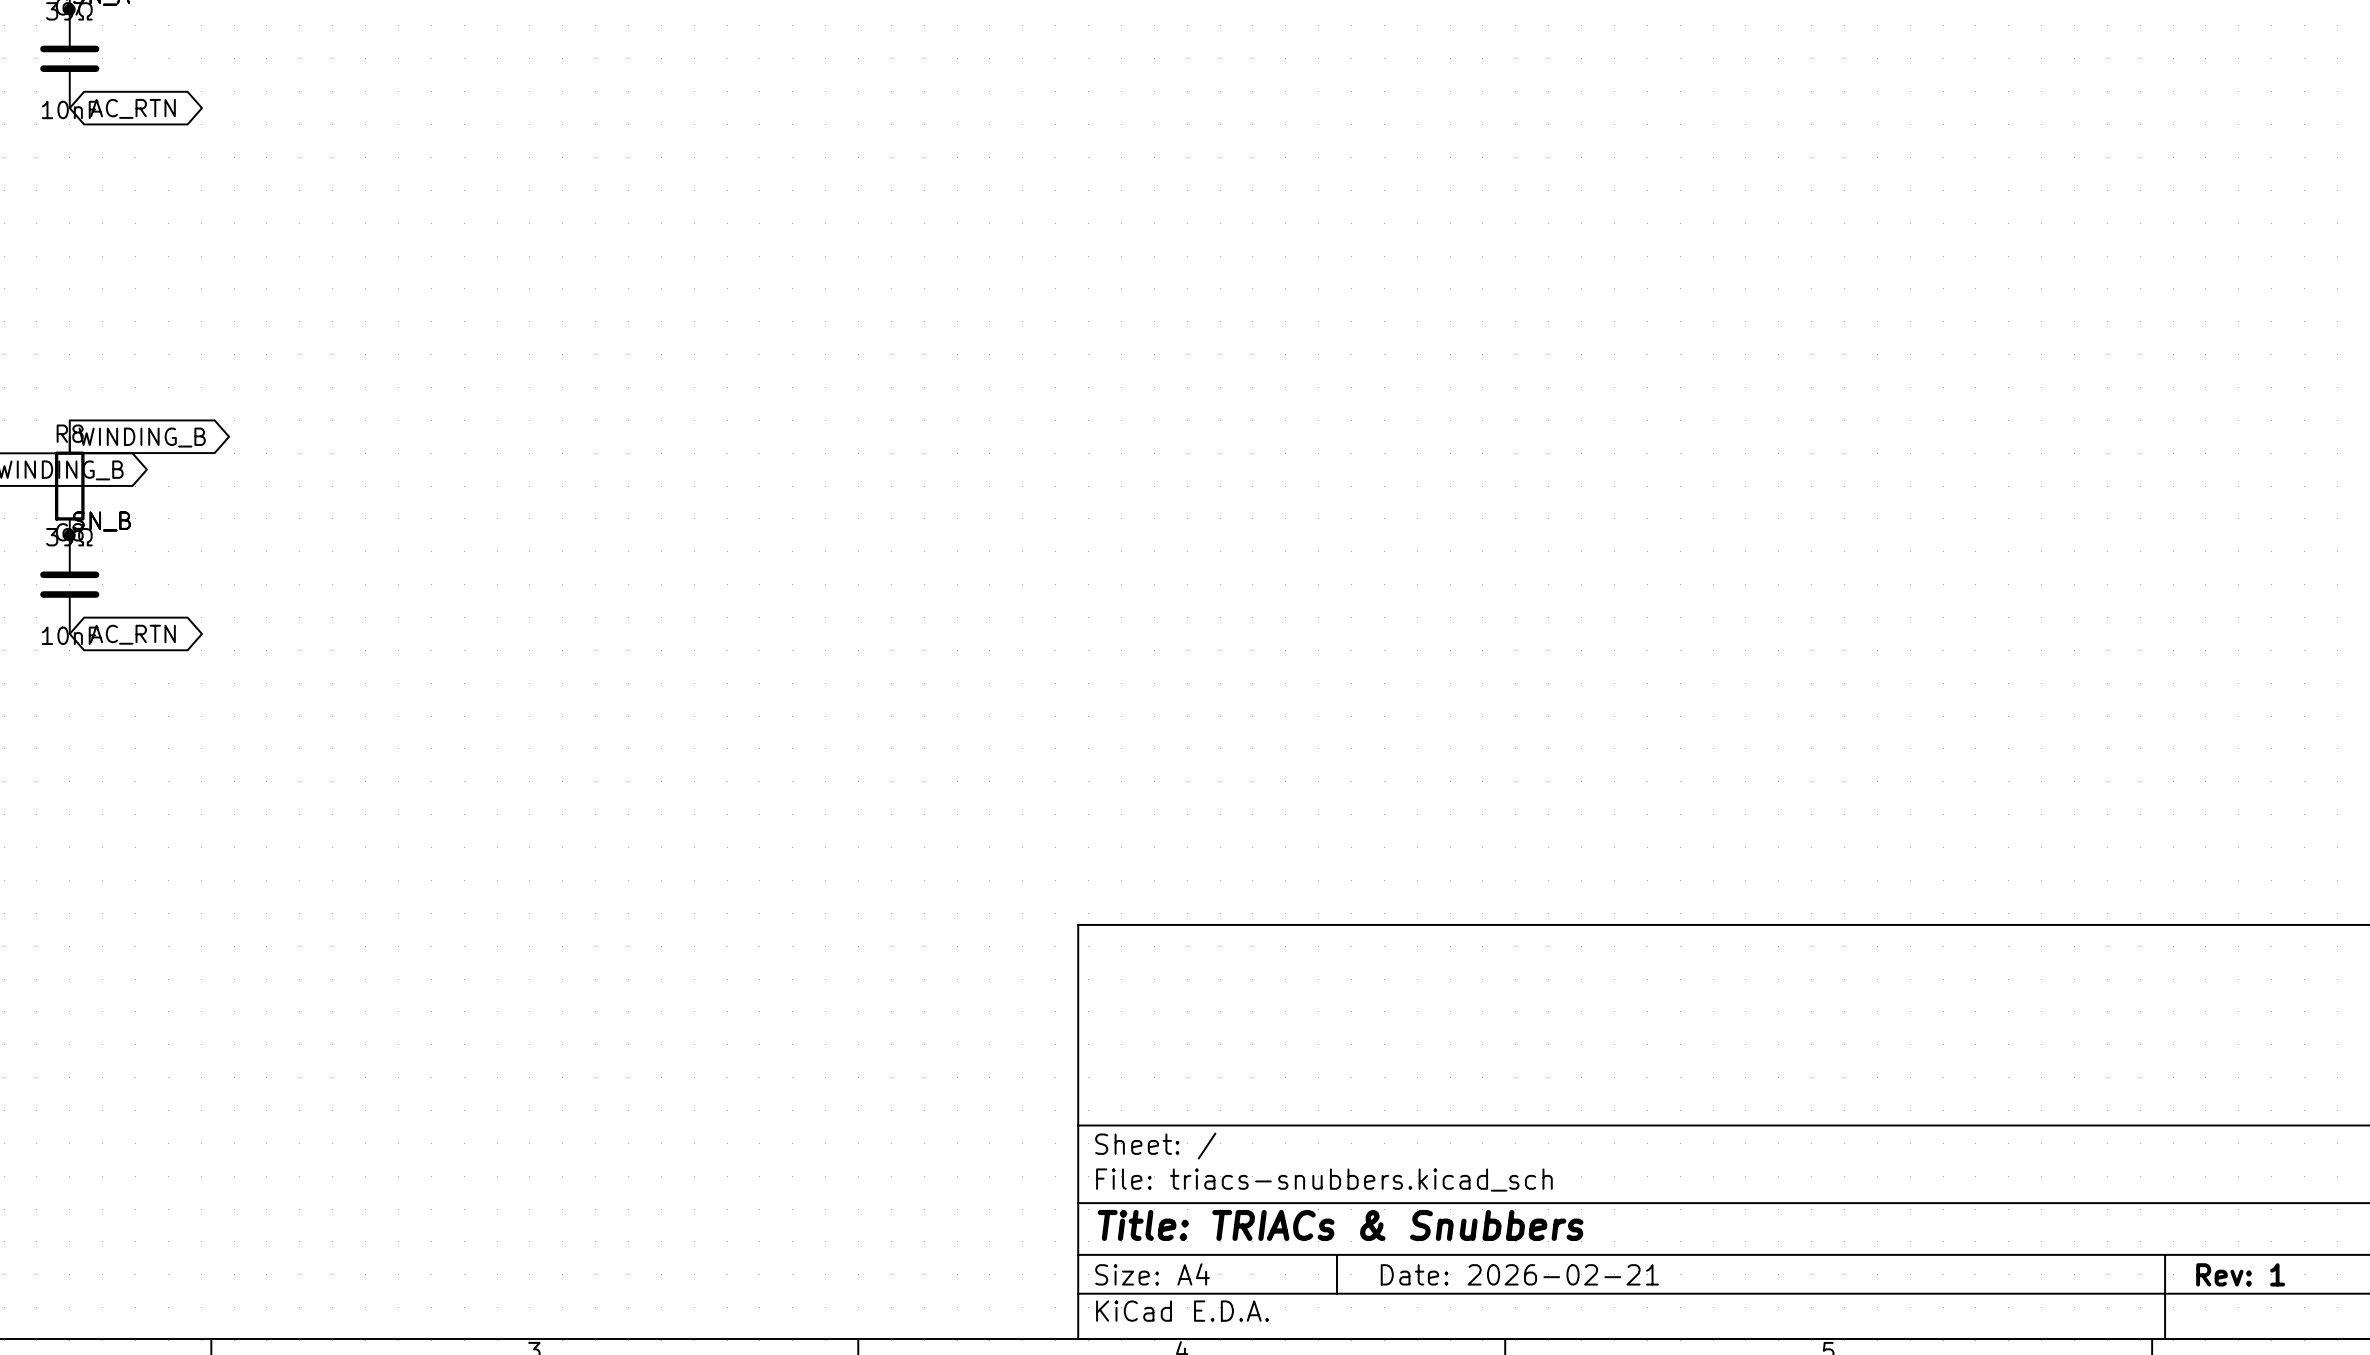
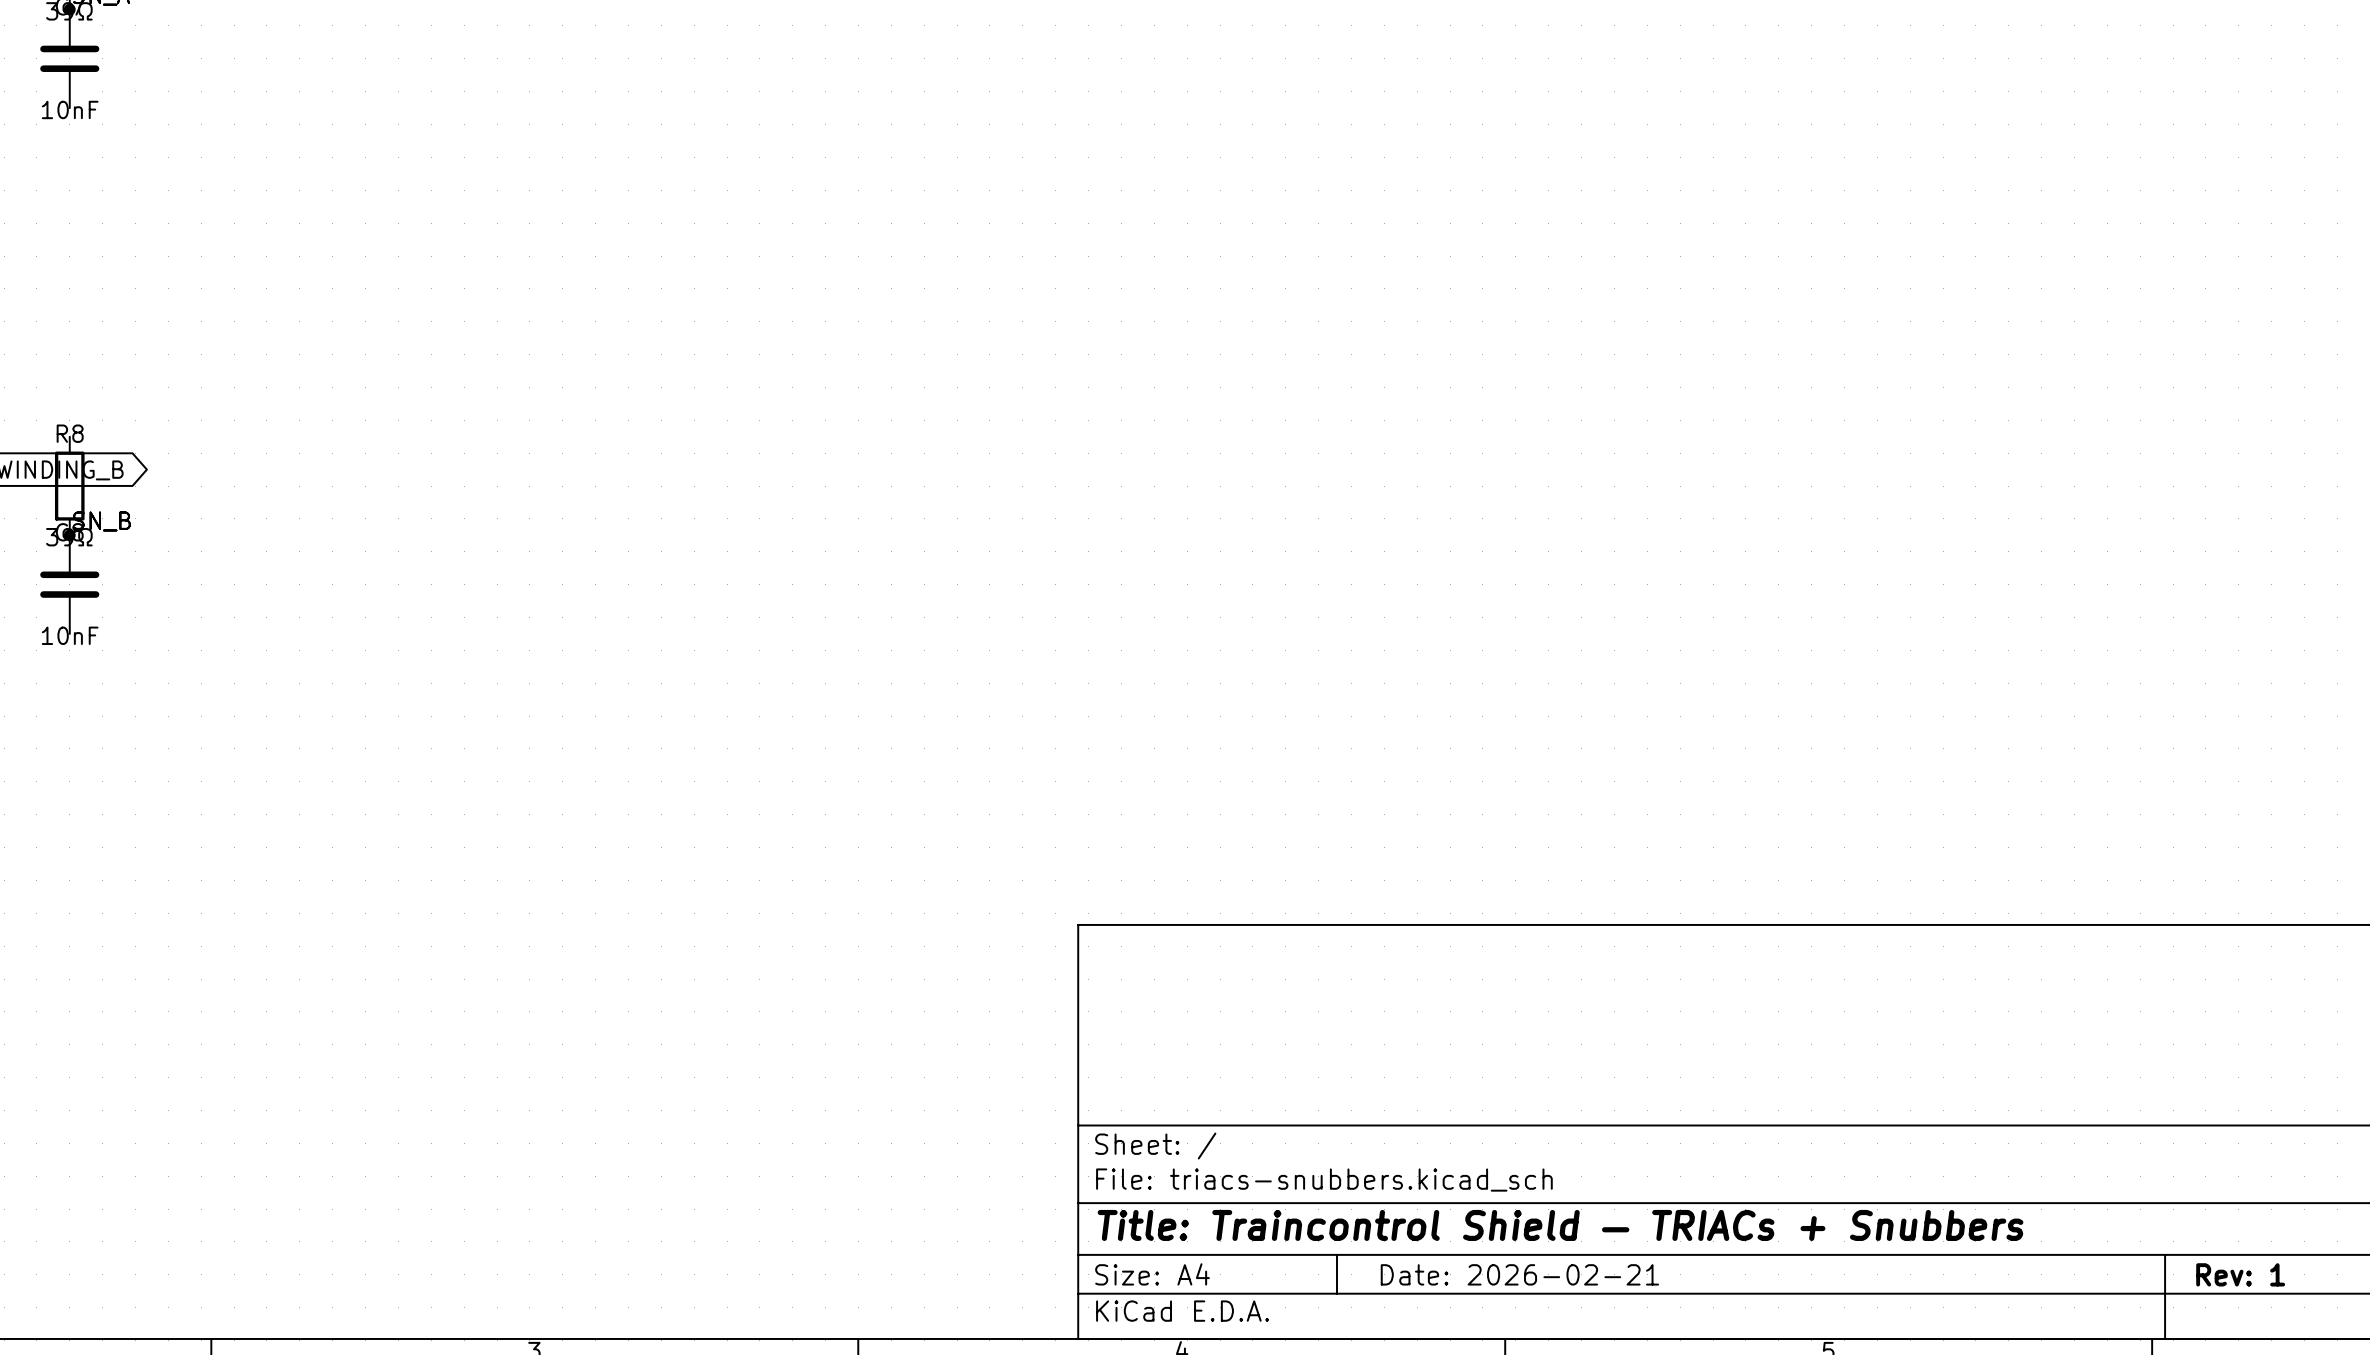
global label: AC_RTN (132, 108) -> none
global label: WINDING_B (142, 437) -> none
global label: AC_RTN (132, 634) -> none
title block: Title: TRIACs & Snubbers (1340, 1225) -> Title: Traincontrol Shield — TRIACs + Snubbers (1560, 1225)

